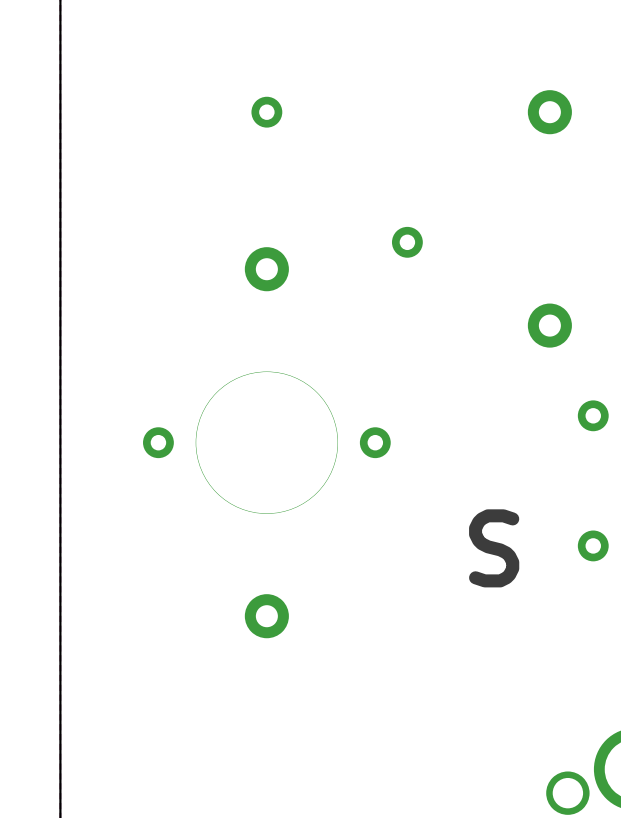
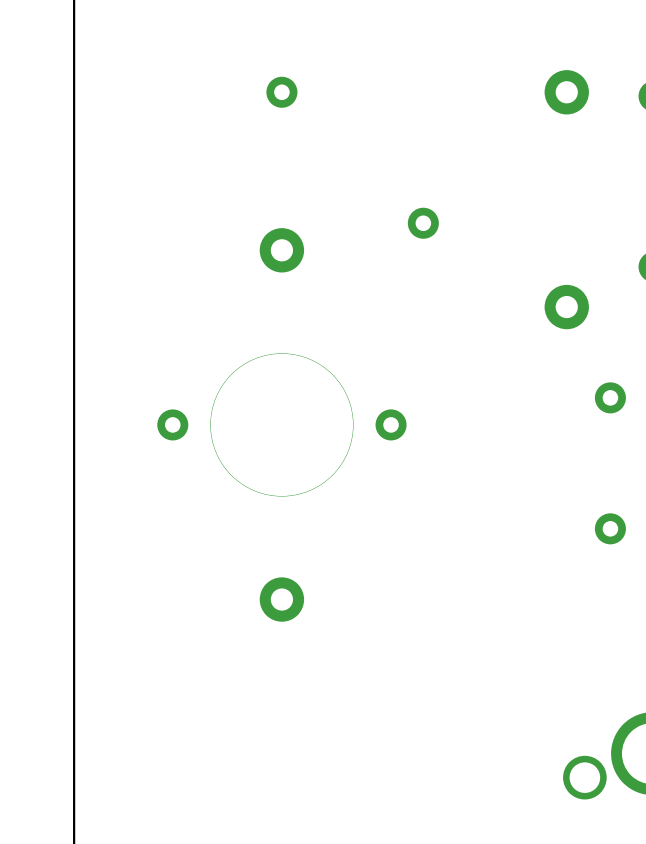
text: S (494, 548) -> none

